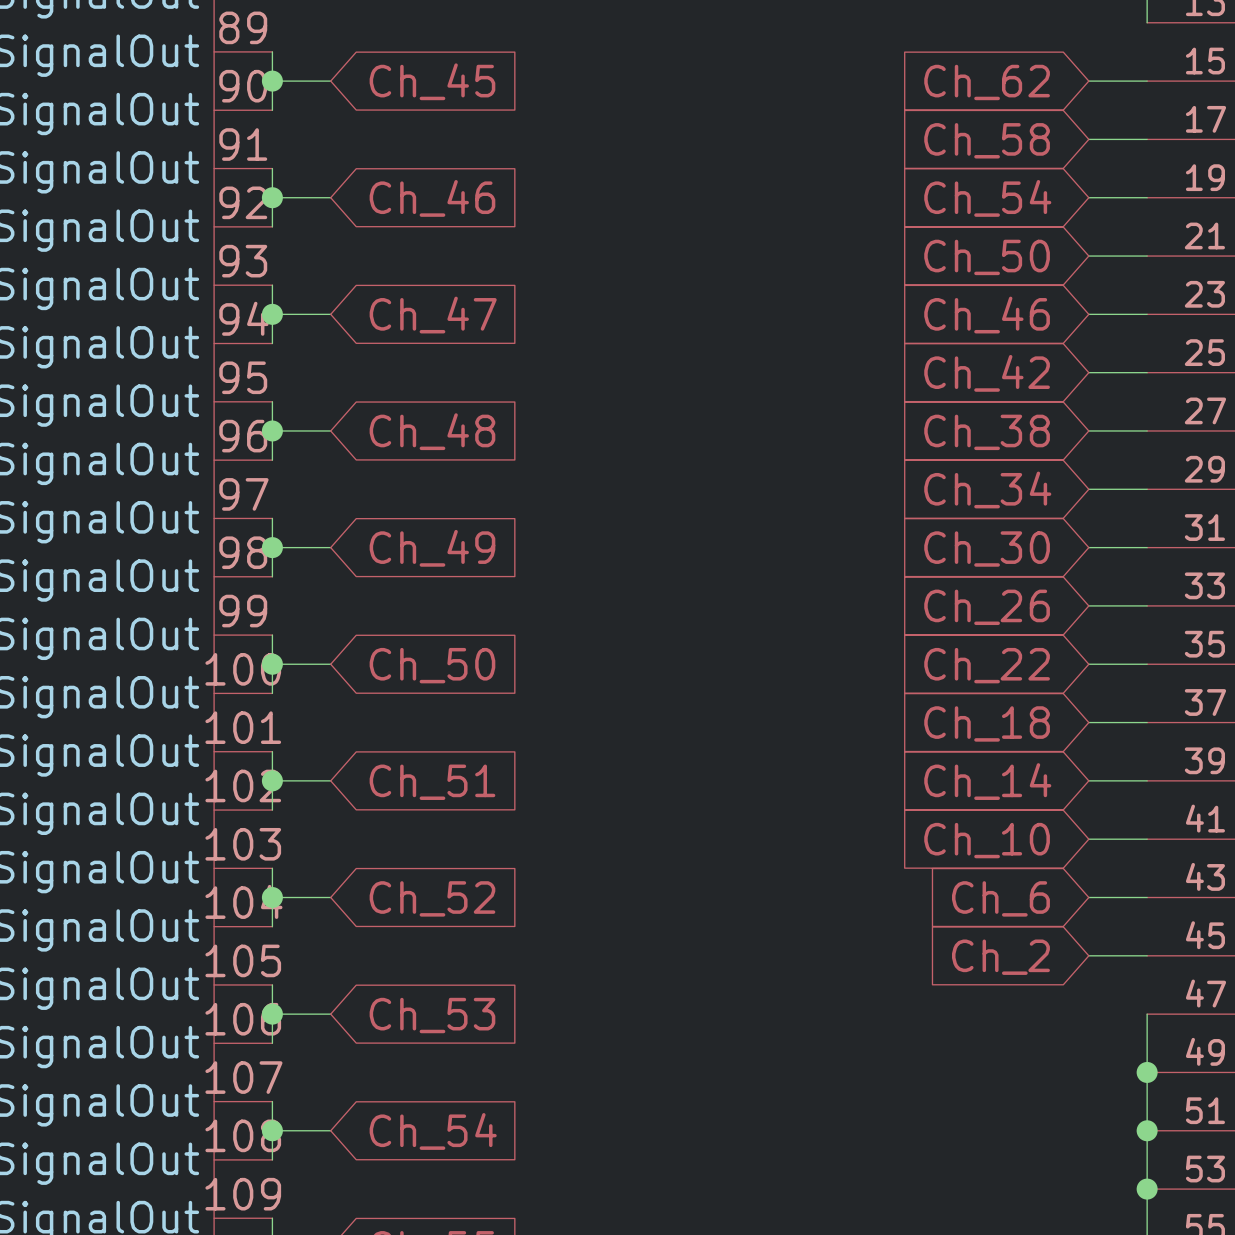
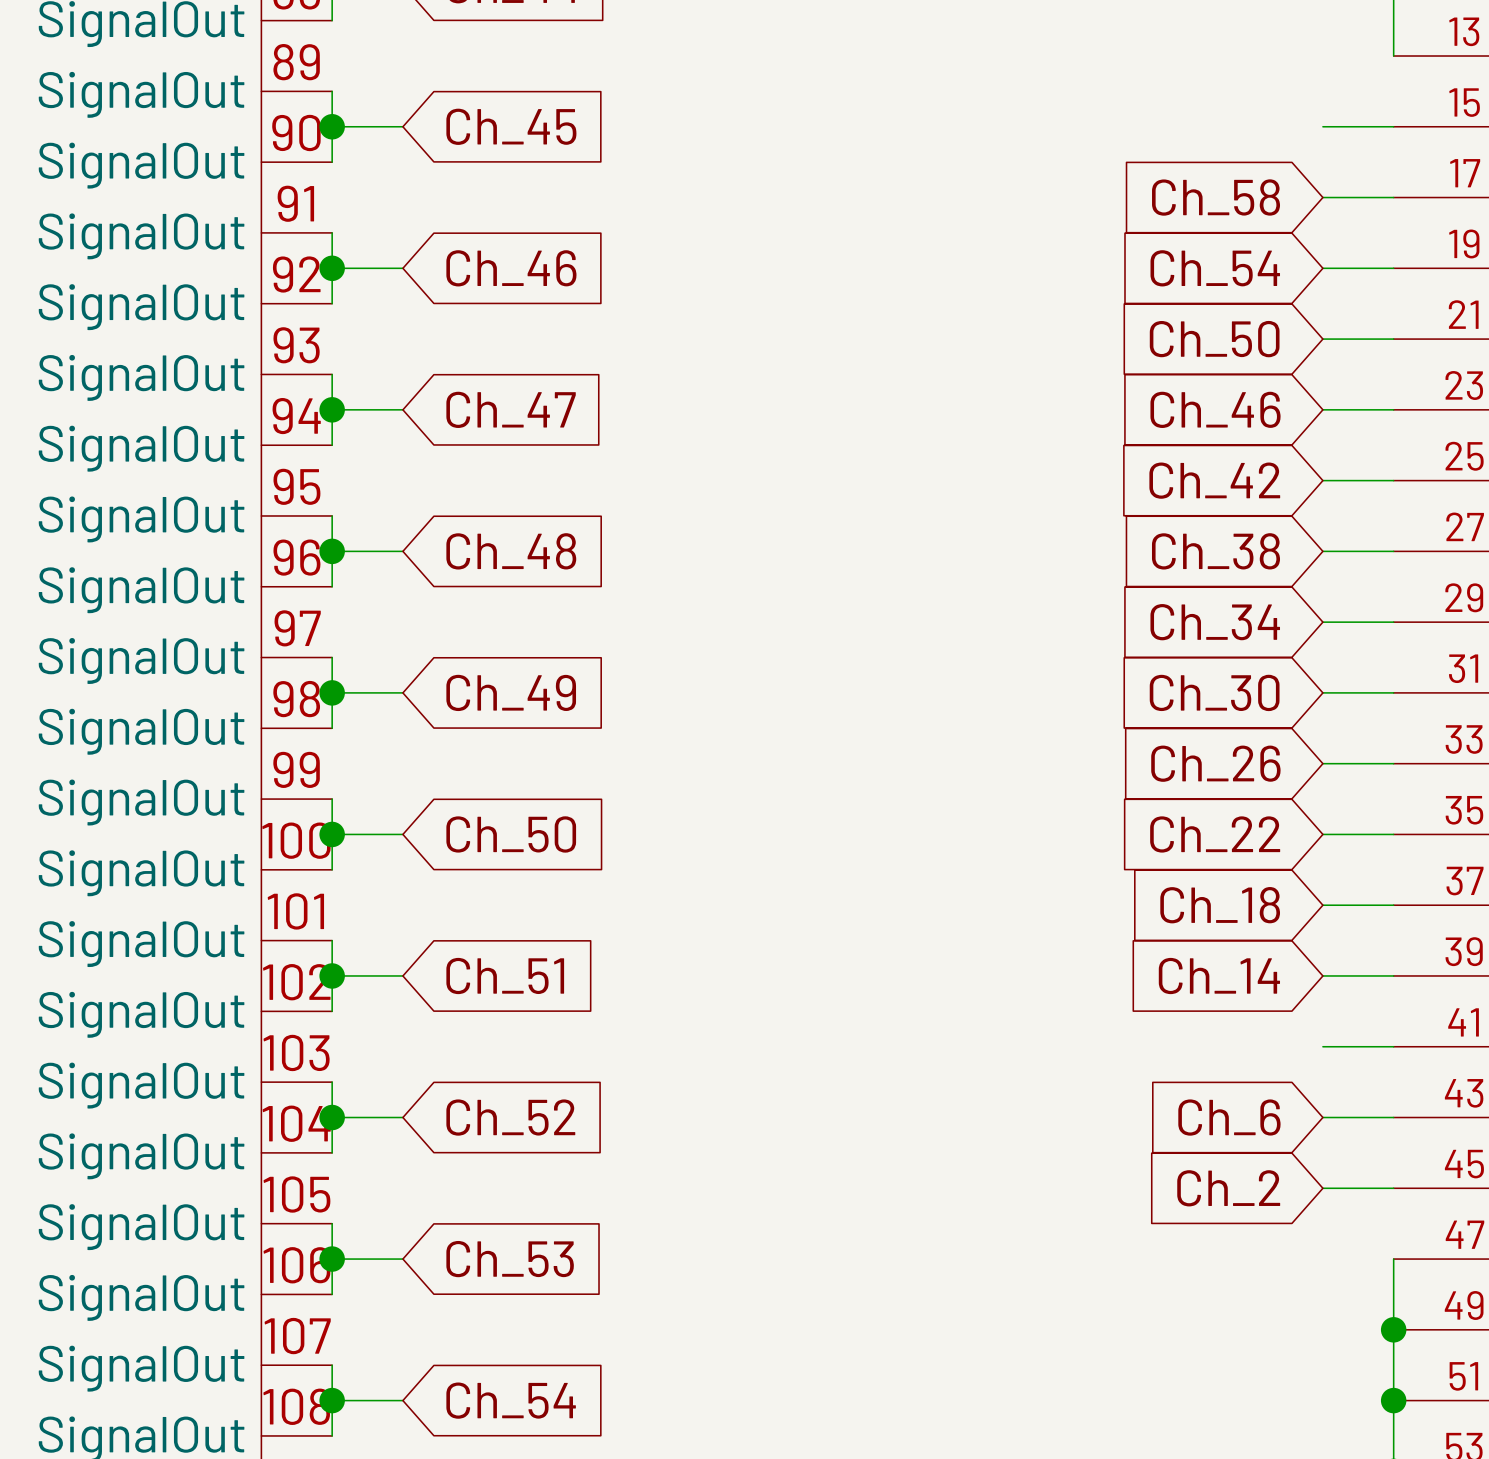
global label: Ch_62 (987, 82) -> none
global label: Ch_10 (987, 840) -> none

